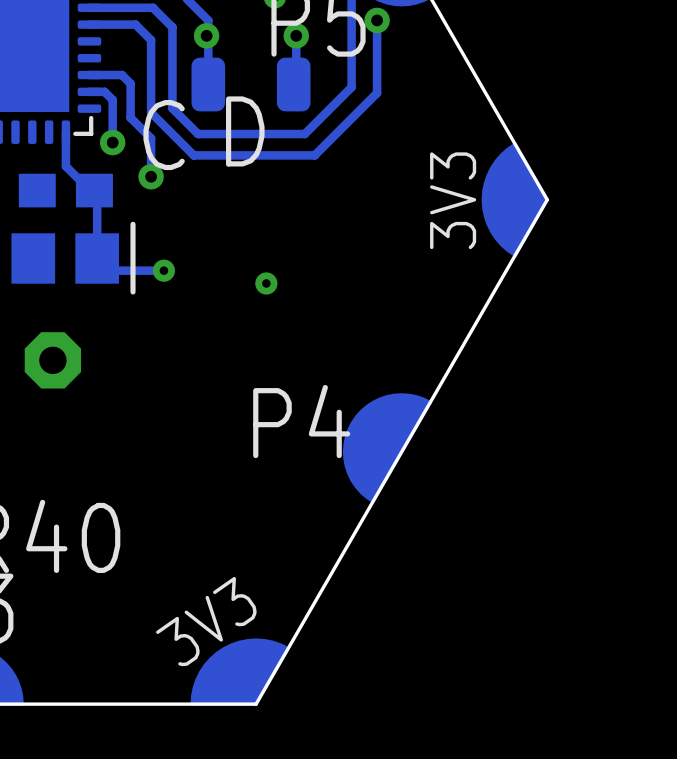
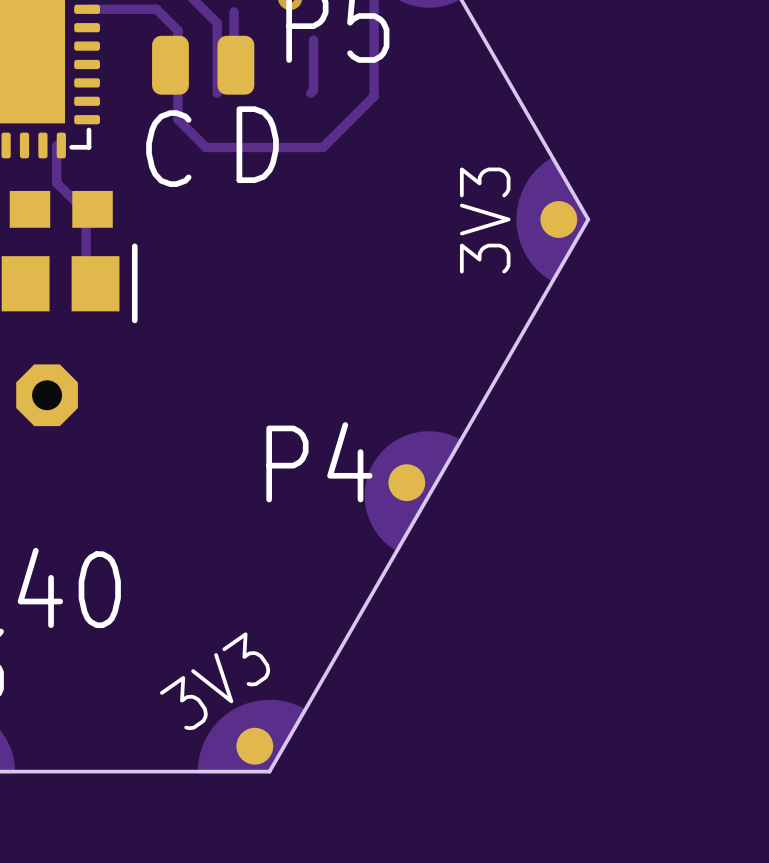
track: none -> (234, 11) (234, 63) (235, 65)
track: (377, 20) (377, 93) (314, 155) (193, 155) (151, 112) (151, 40) (135, 24) (89, 24) -> none
via: (377, 20) -> none
via: (206, 35) -> none
via: (296, 35) -> none
part: none -> (170, 65)
part: none -> (235, 65)
track: (89, 75) (121, 75) (130, 83) (130, 117) -> none
part: (208, 84) -> none
part: (293, 84) -> none
track: (89, 91) (104, 91) (112, 99) (112, 142) -> none
track: (130, 117) (151, 138) (151, 176) -> none
track: none -> (56, 145) (56, 182) (83, 209) (86, 215) (86, 283)
track: (65, 132) (65, 166) (90, 190) (94, 190) (97, 196) (97, 258) (109, 270) (163, 270) -> none
via: (112, 142) -> none
via: (151, 176) -> none
via: (163, 270) -> none
via: (266, 283) -> none

